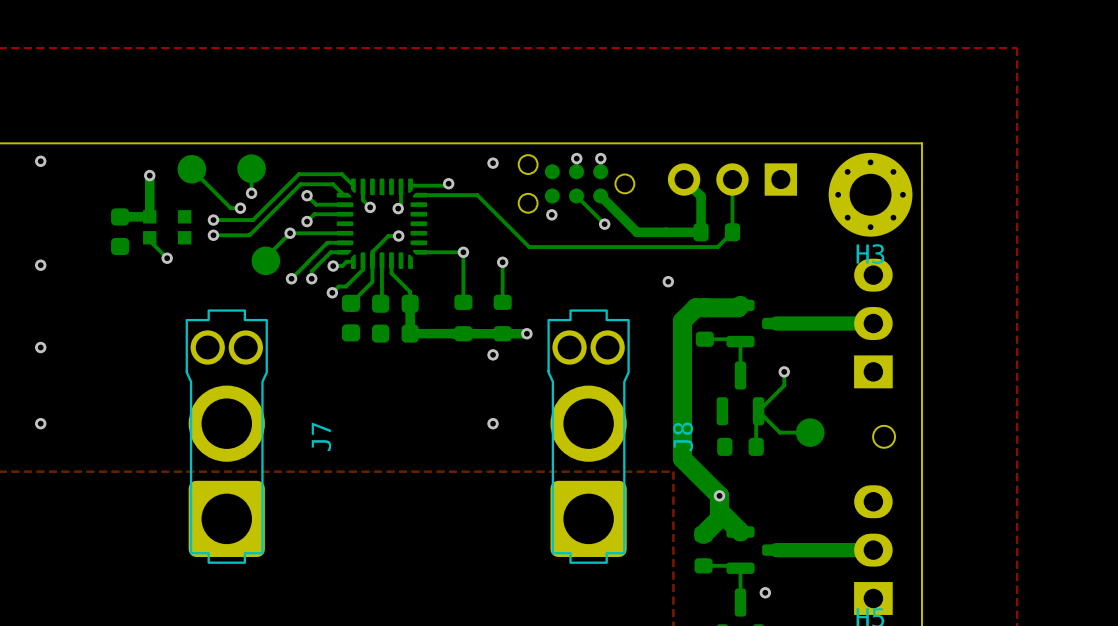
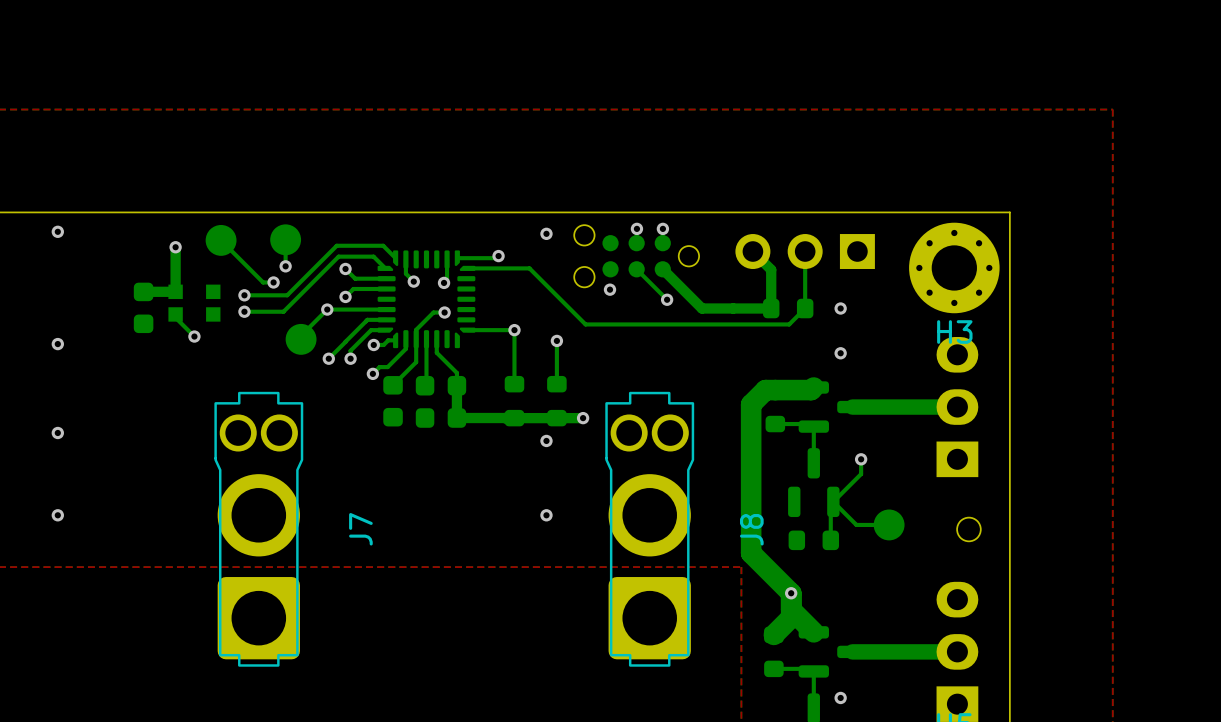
via: none -> (840, 308)
via: none -> (840, 353)
via: (668, 281) -> none

